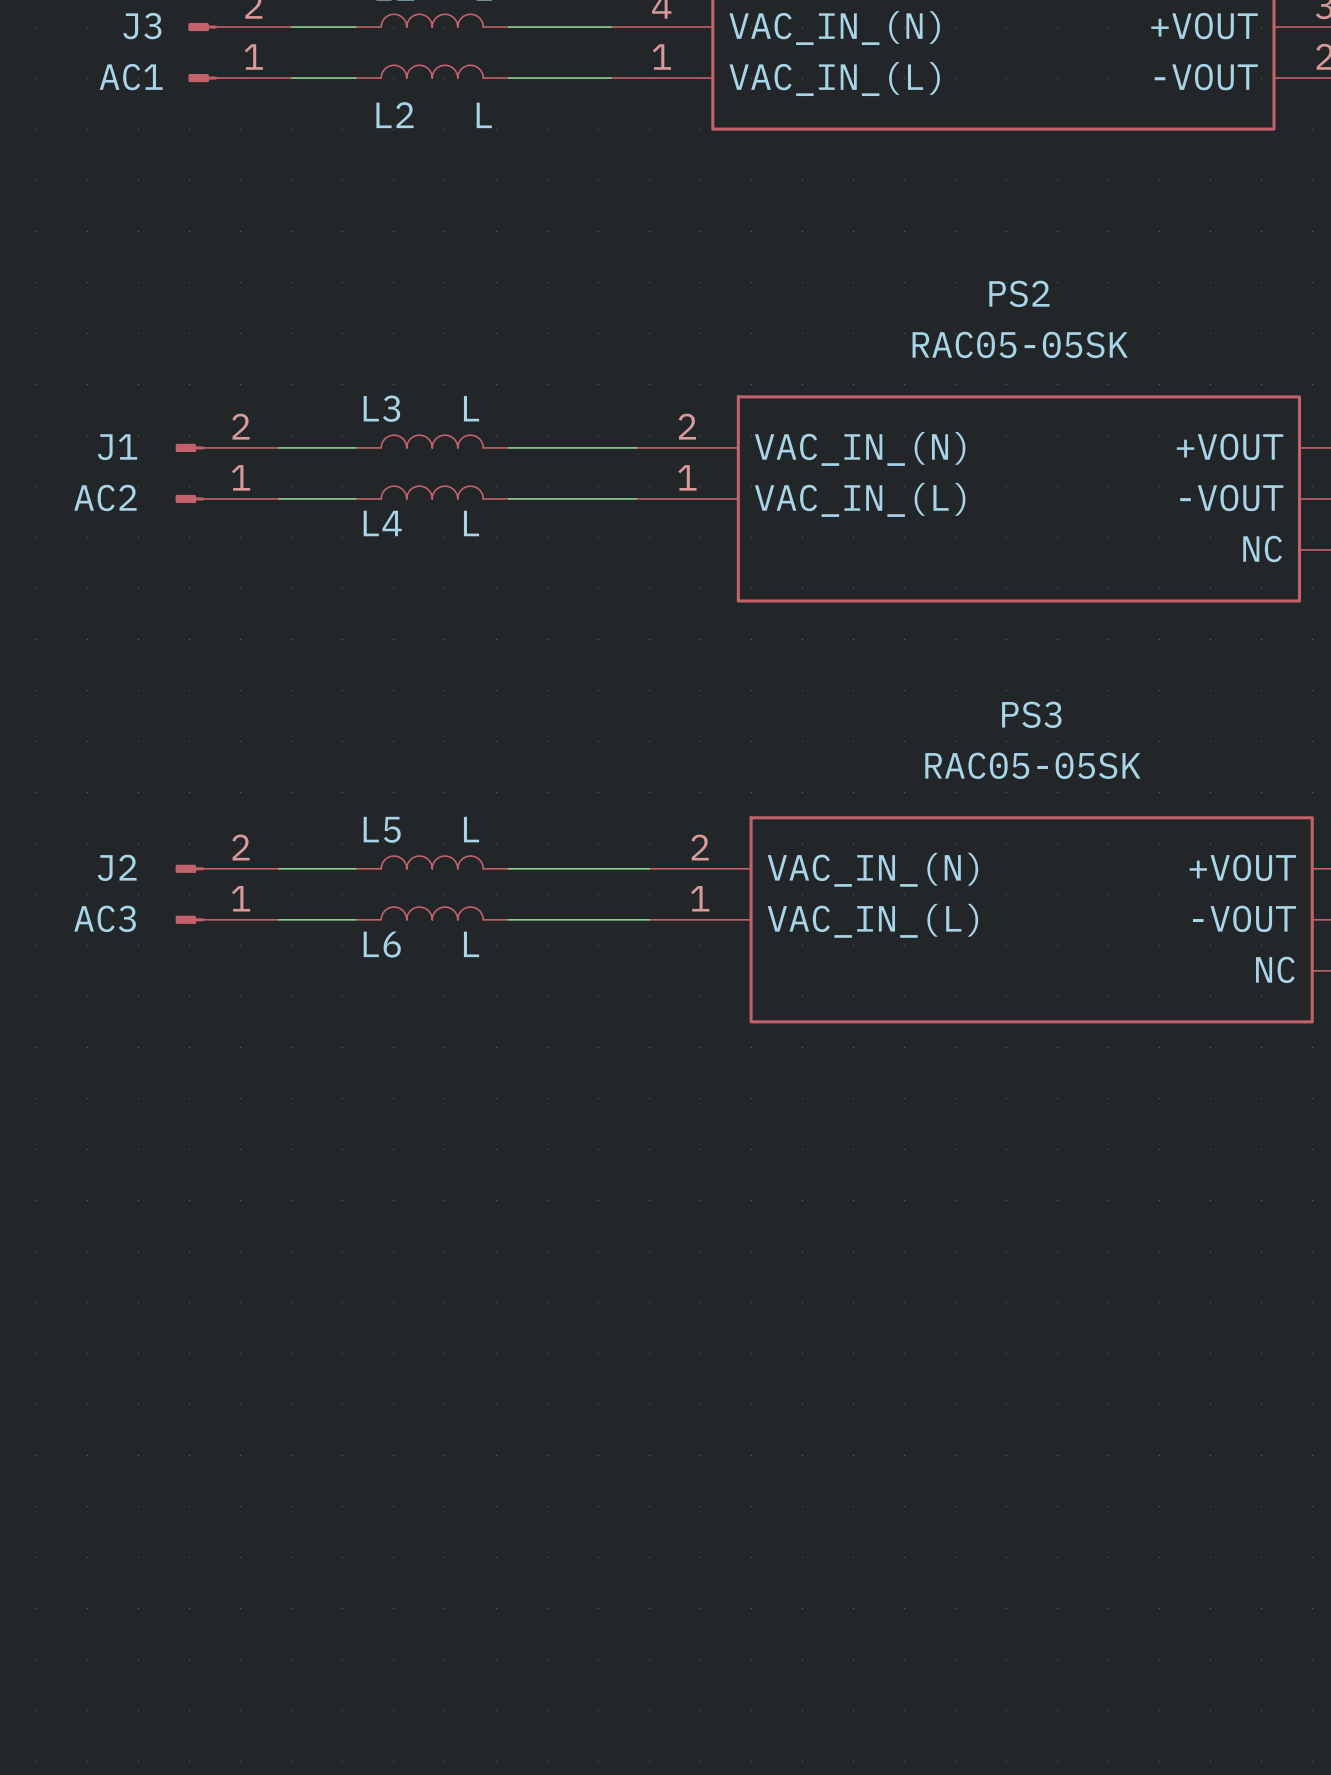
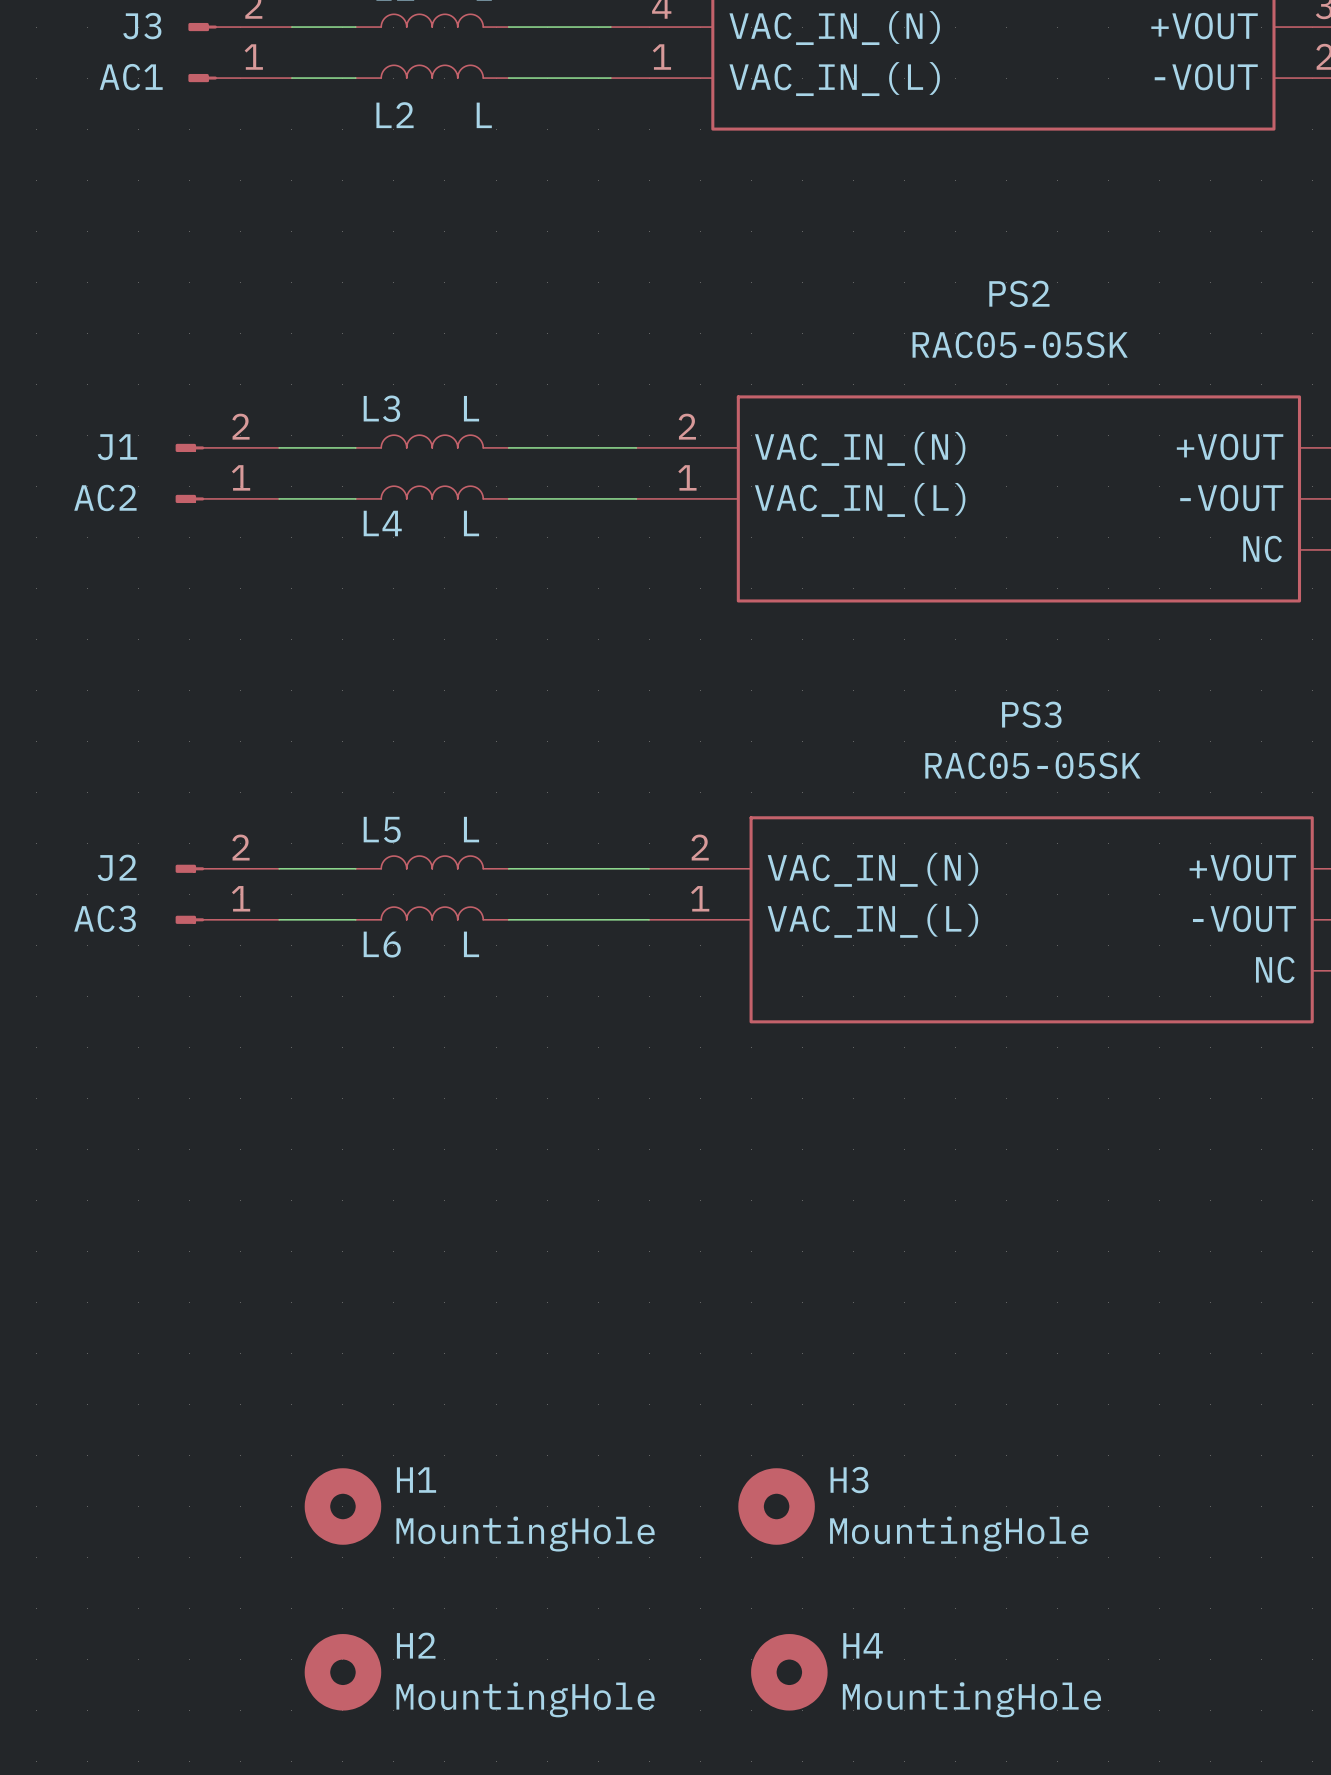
H1: none -> MountingHole (342, 1506)
H3: none -> MountingHole (776, 1506)
H2: none -> MountingHole (342, 1672)
H4: none -> MountingHole (789, 1672)

